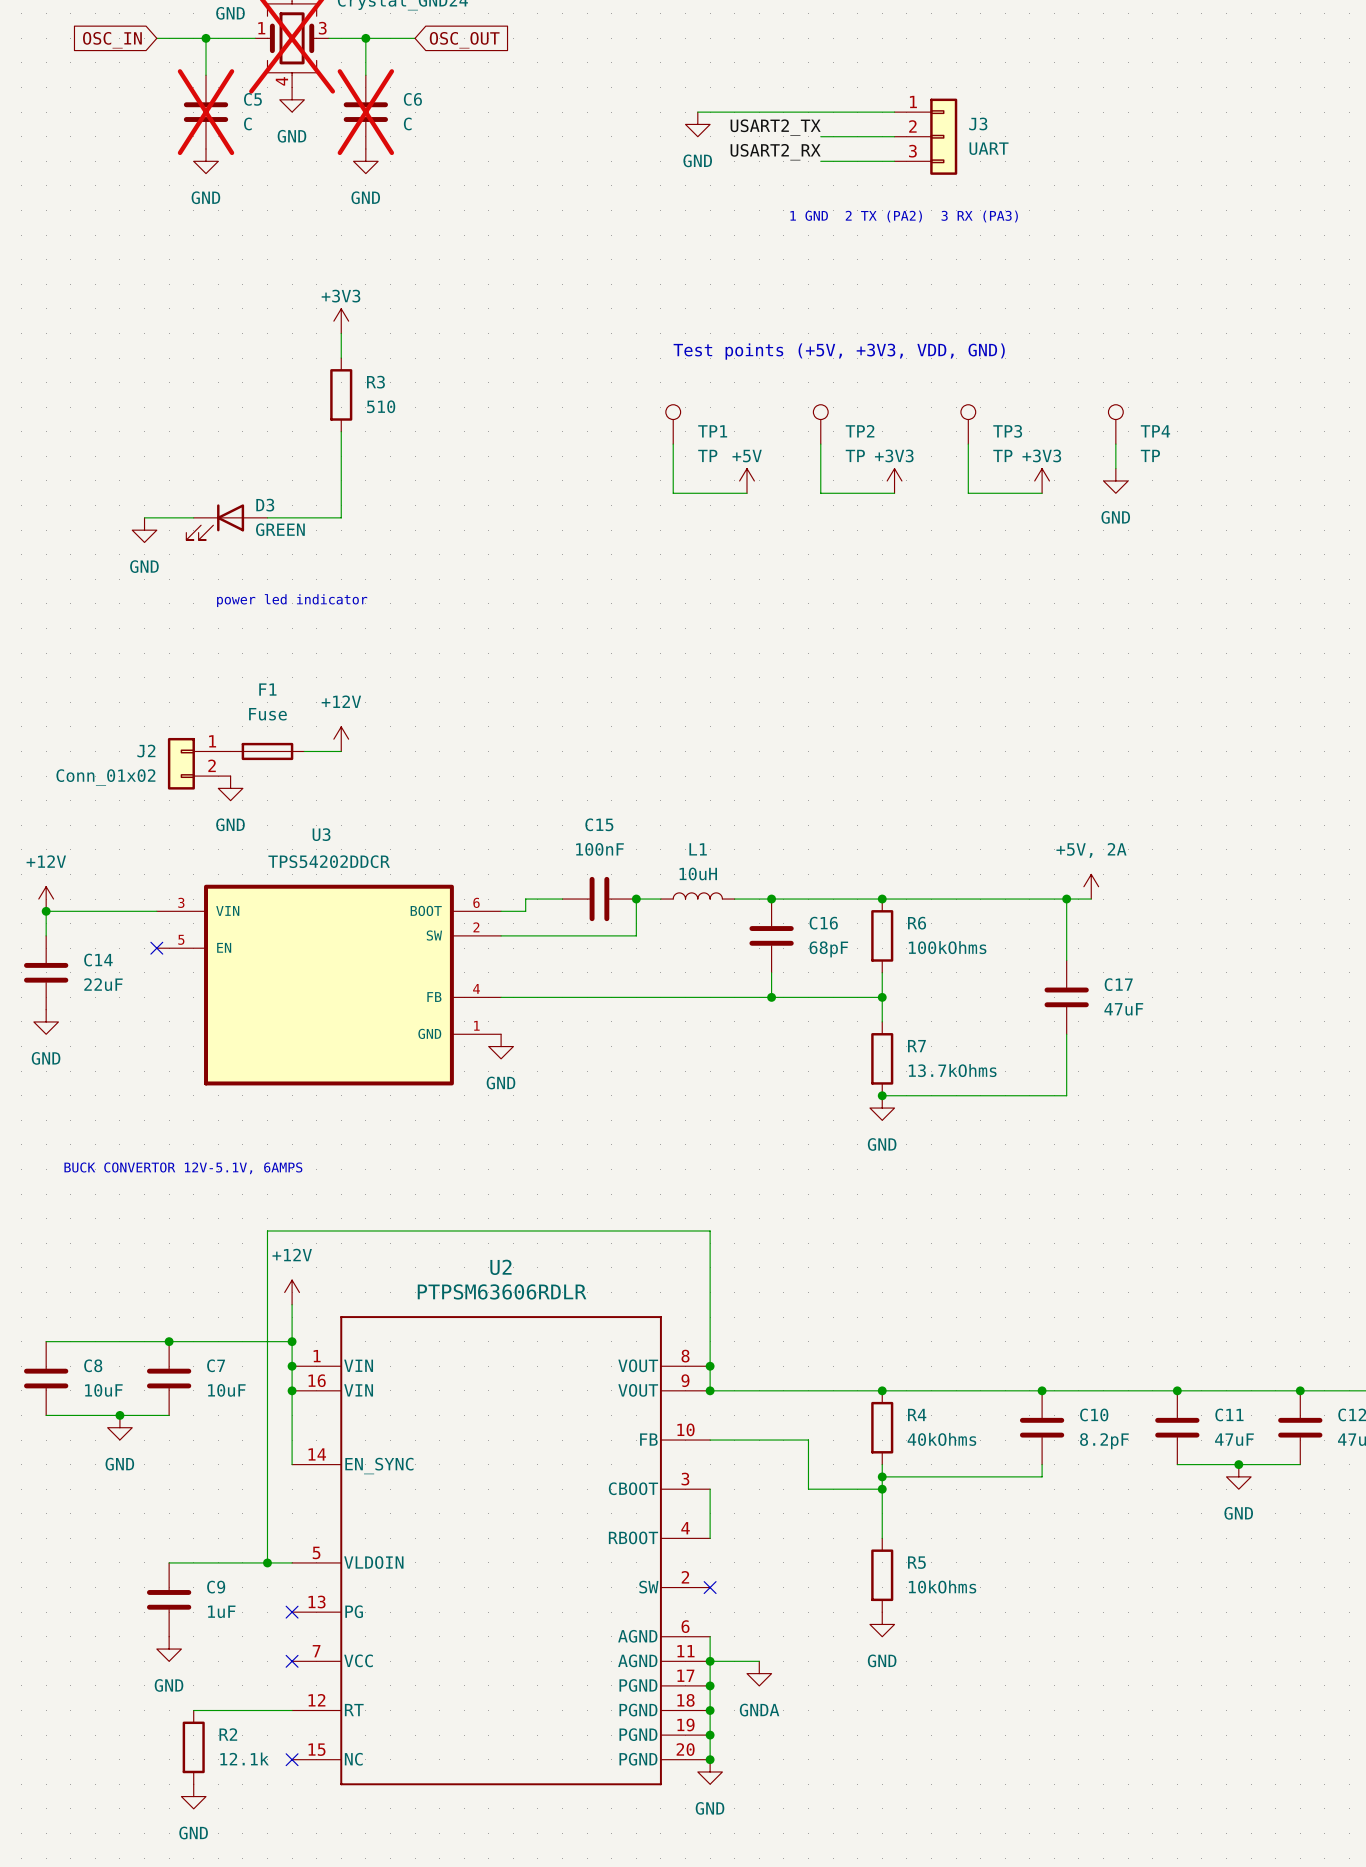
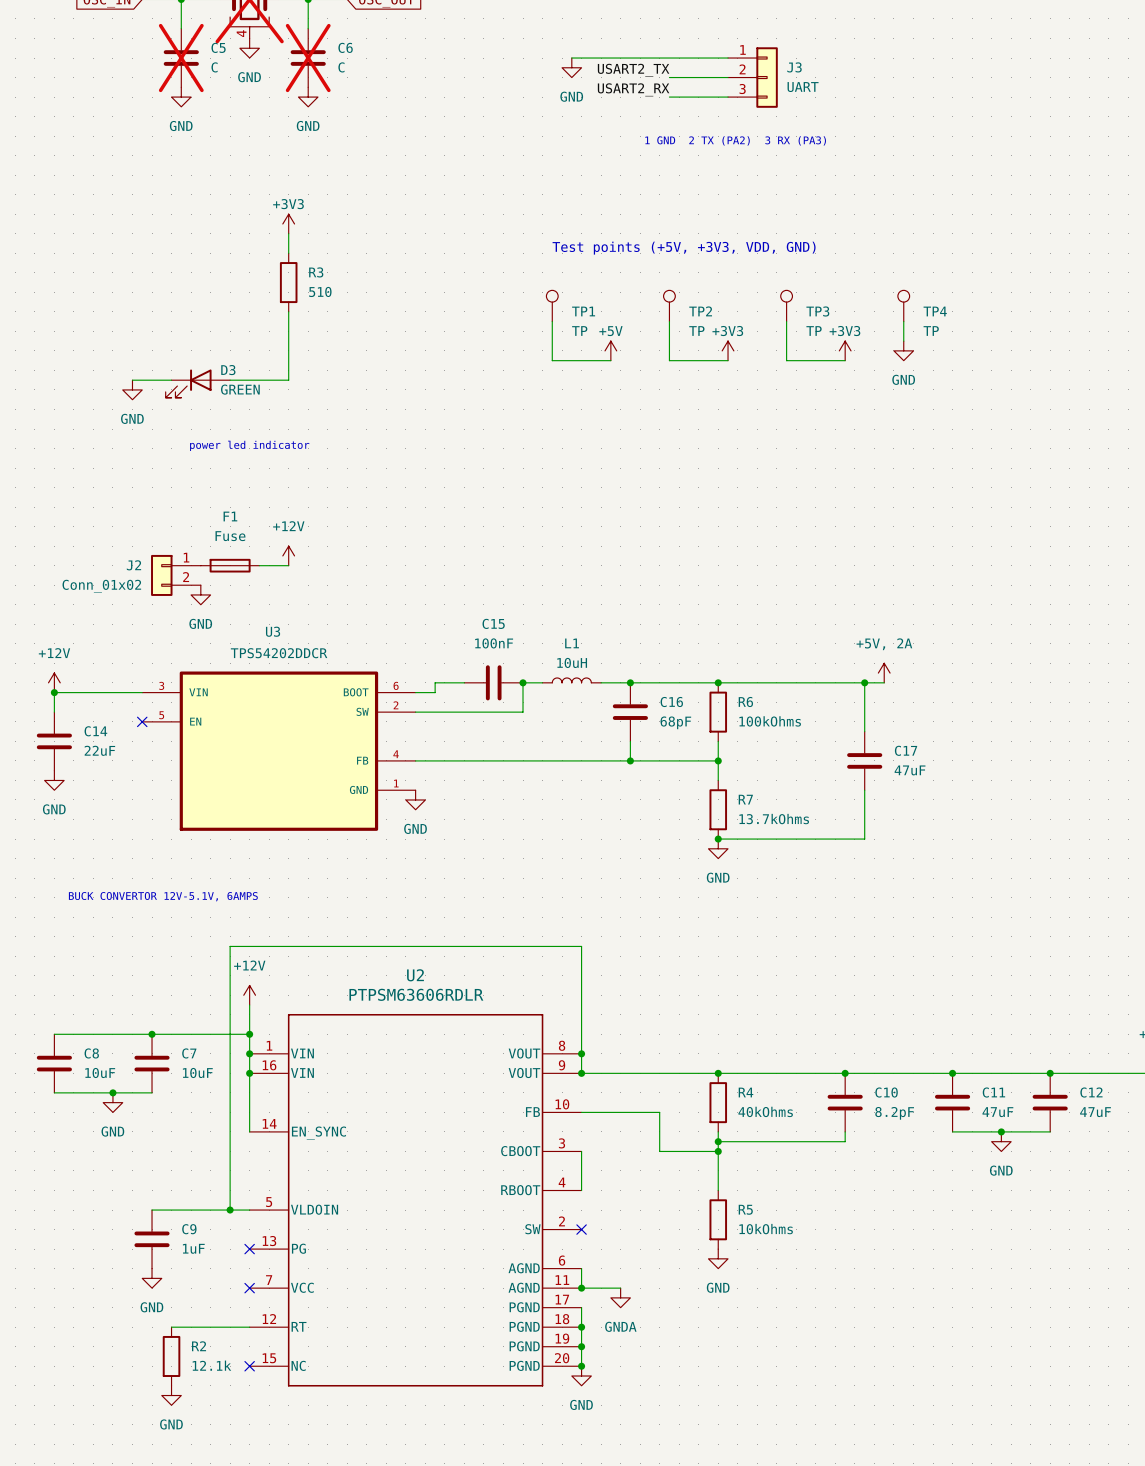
wire: (710, 1661) (710, 1685) -> none
junction: (710, 1685) -> none

